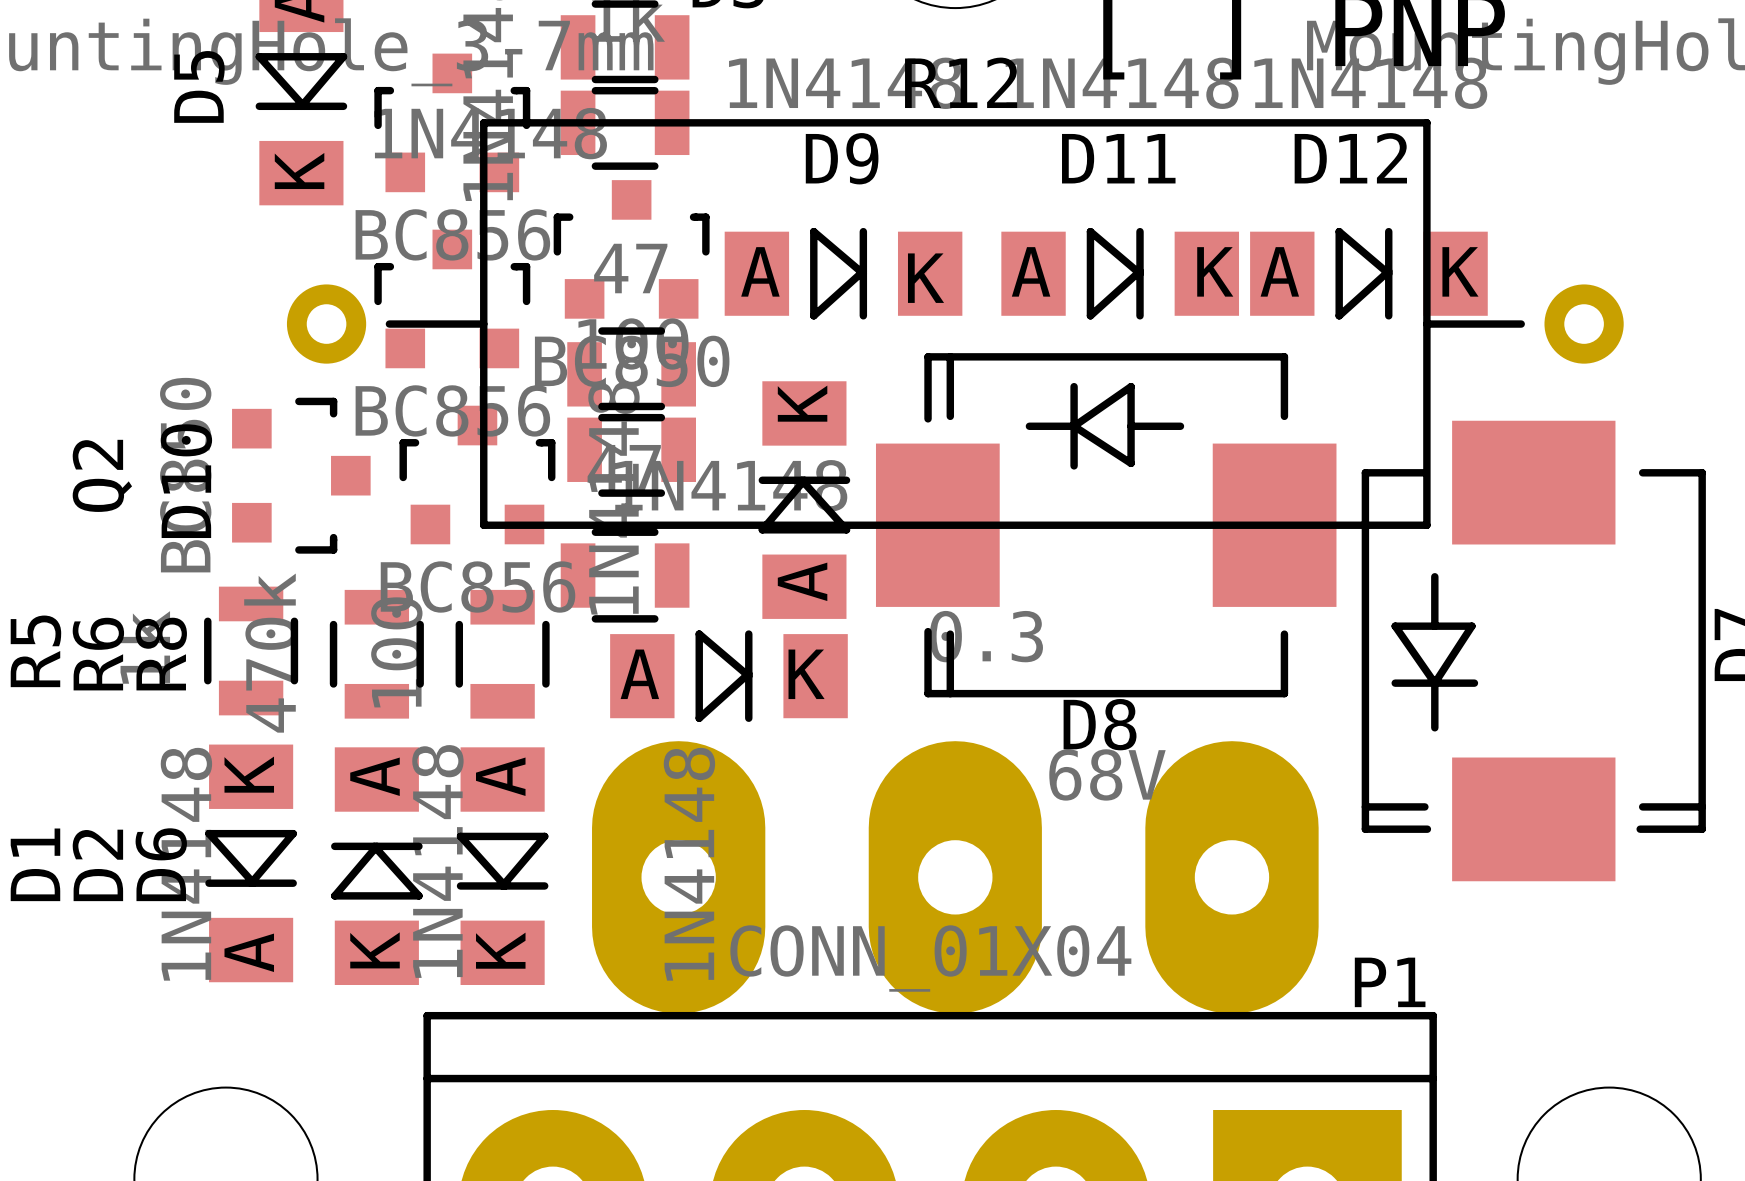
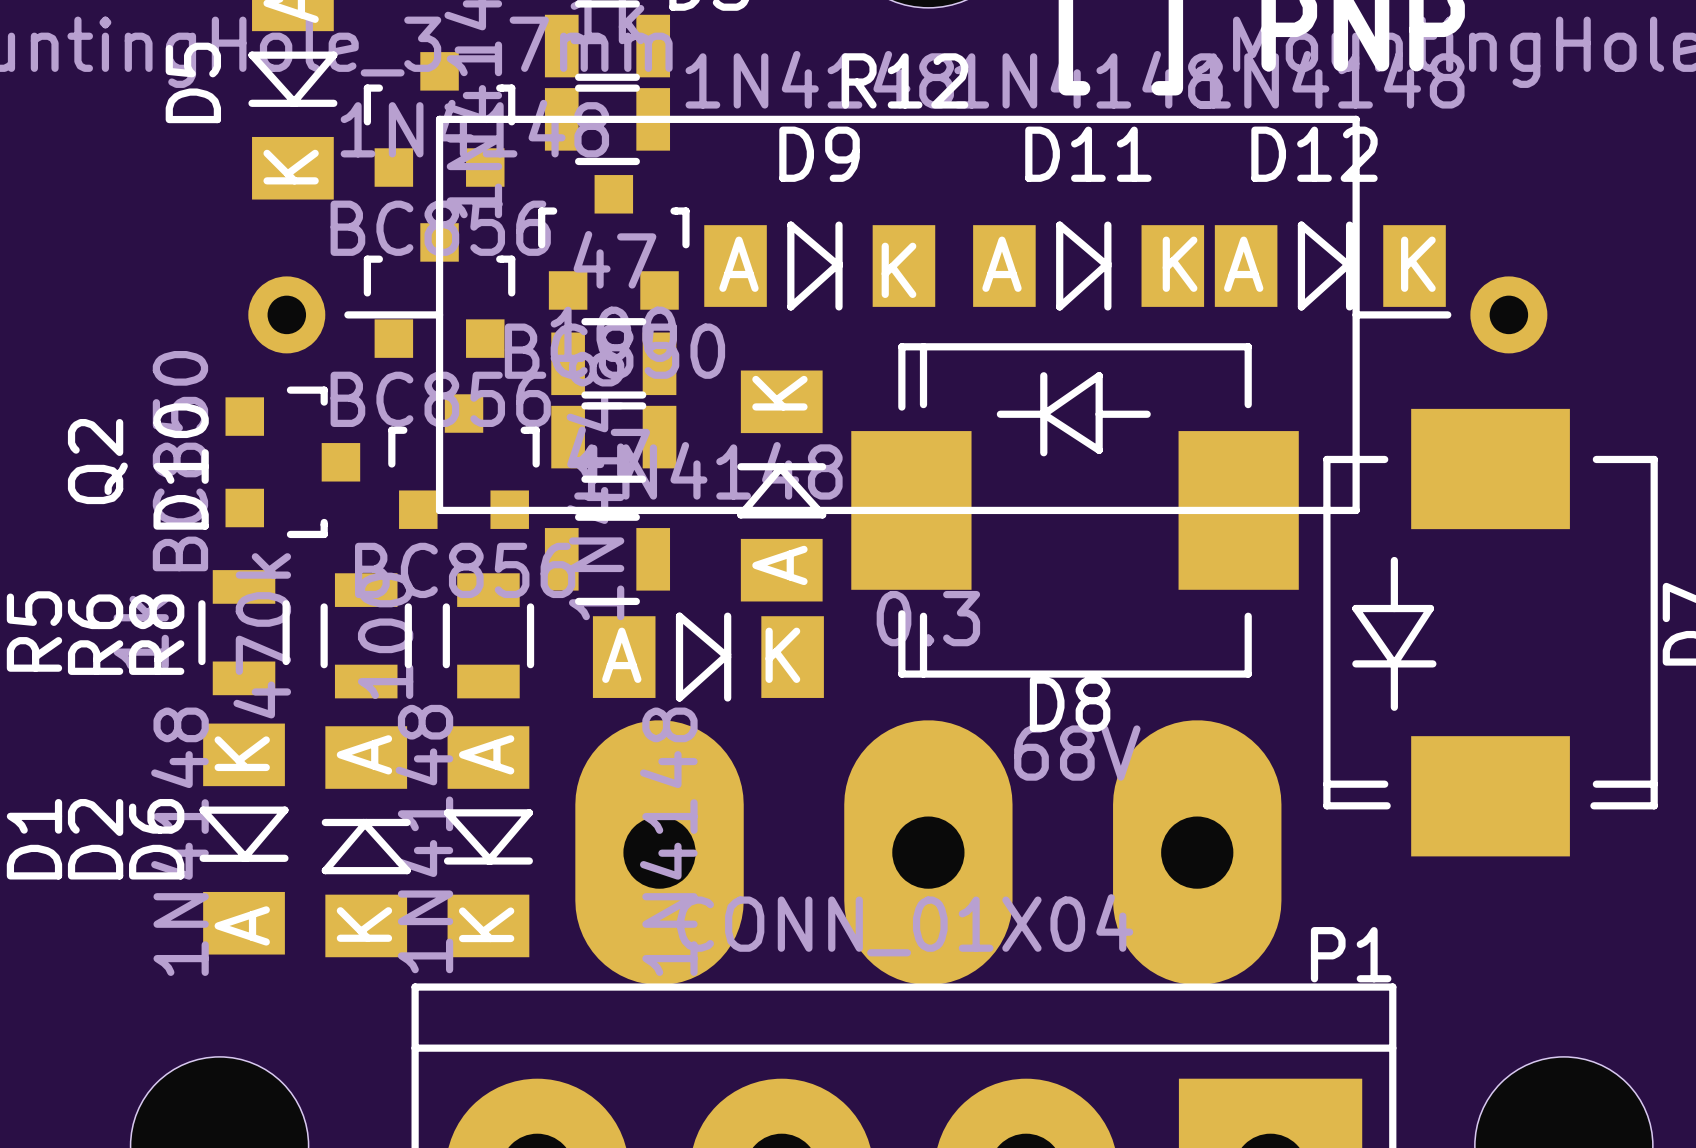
R12 position: (955, 324) -> (897, 314)

